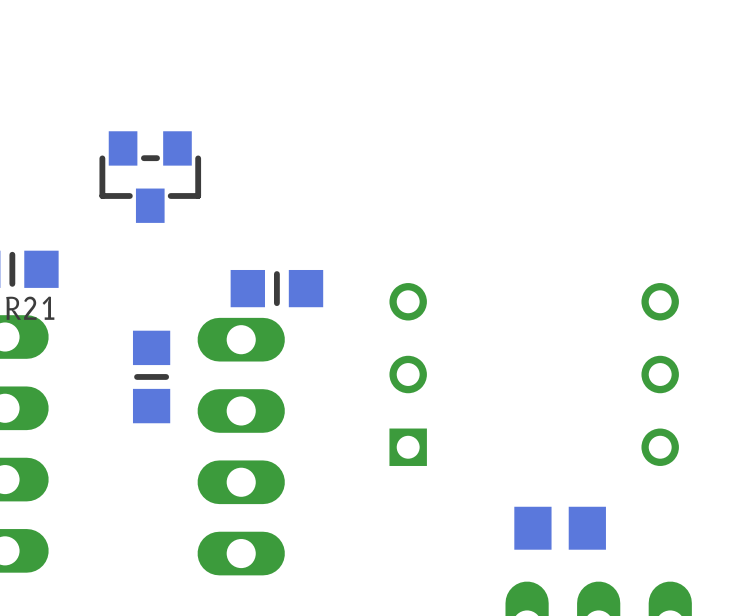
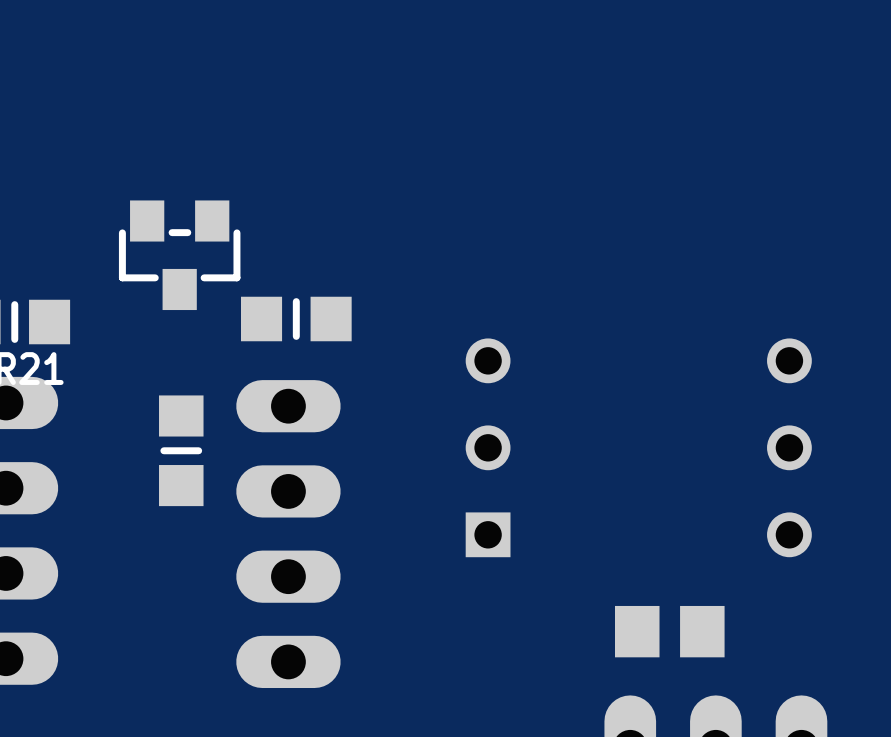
part position: (150, 177) -> (179, 255)
part position: (276, 288) -> (296, 319)

